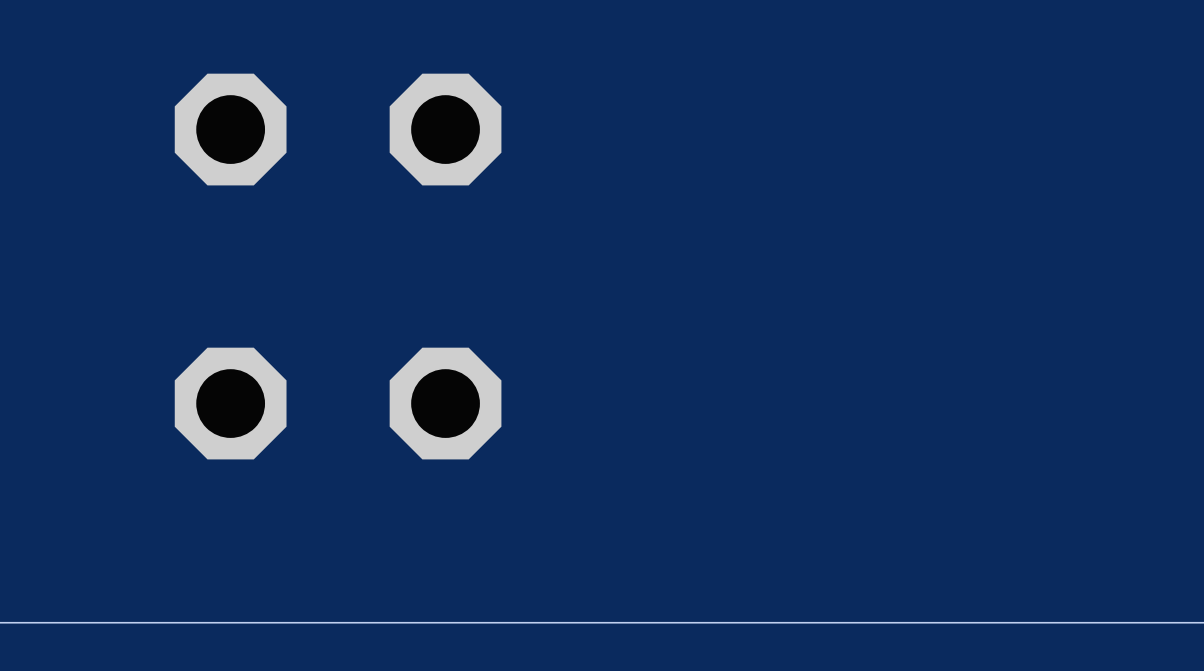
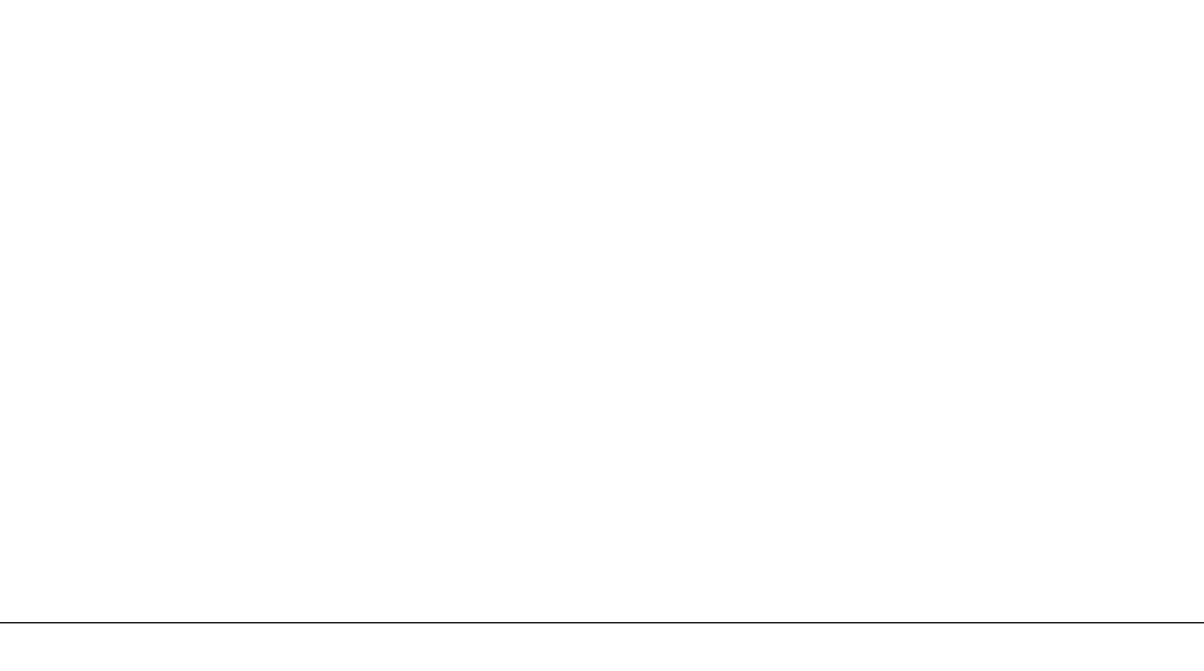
part: (338, 129) -> none
part: (338, 403) -> none

